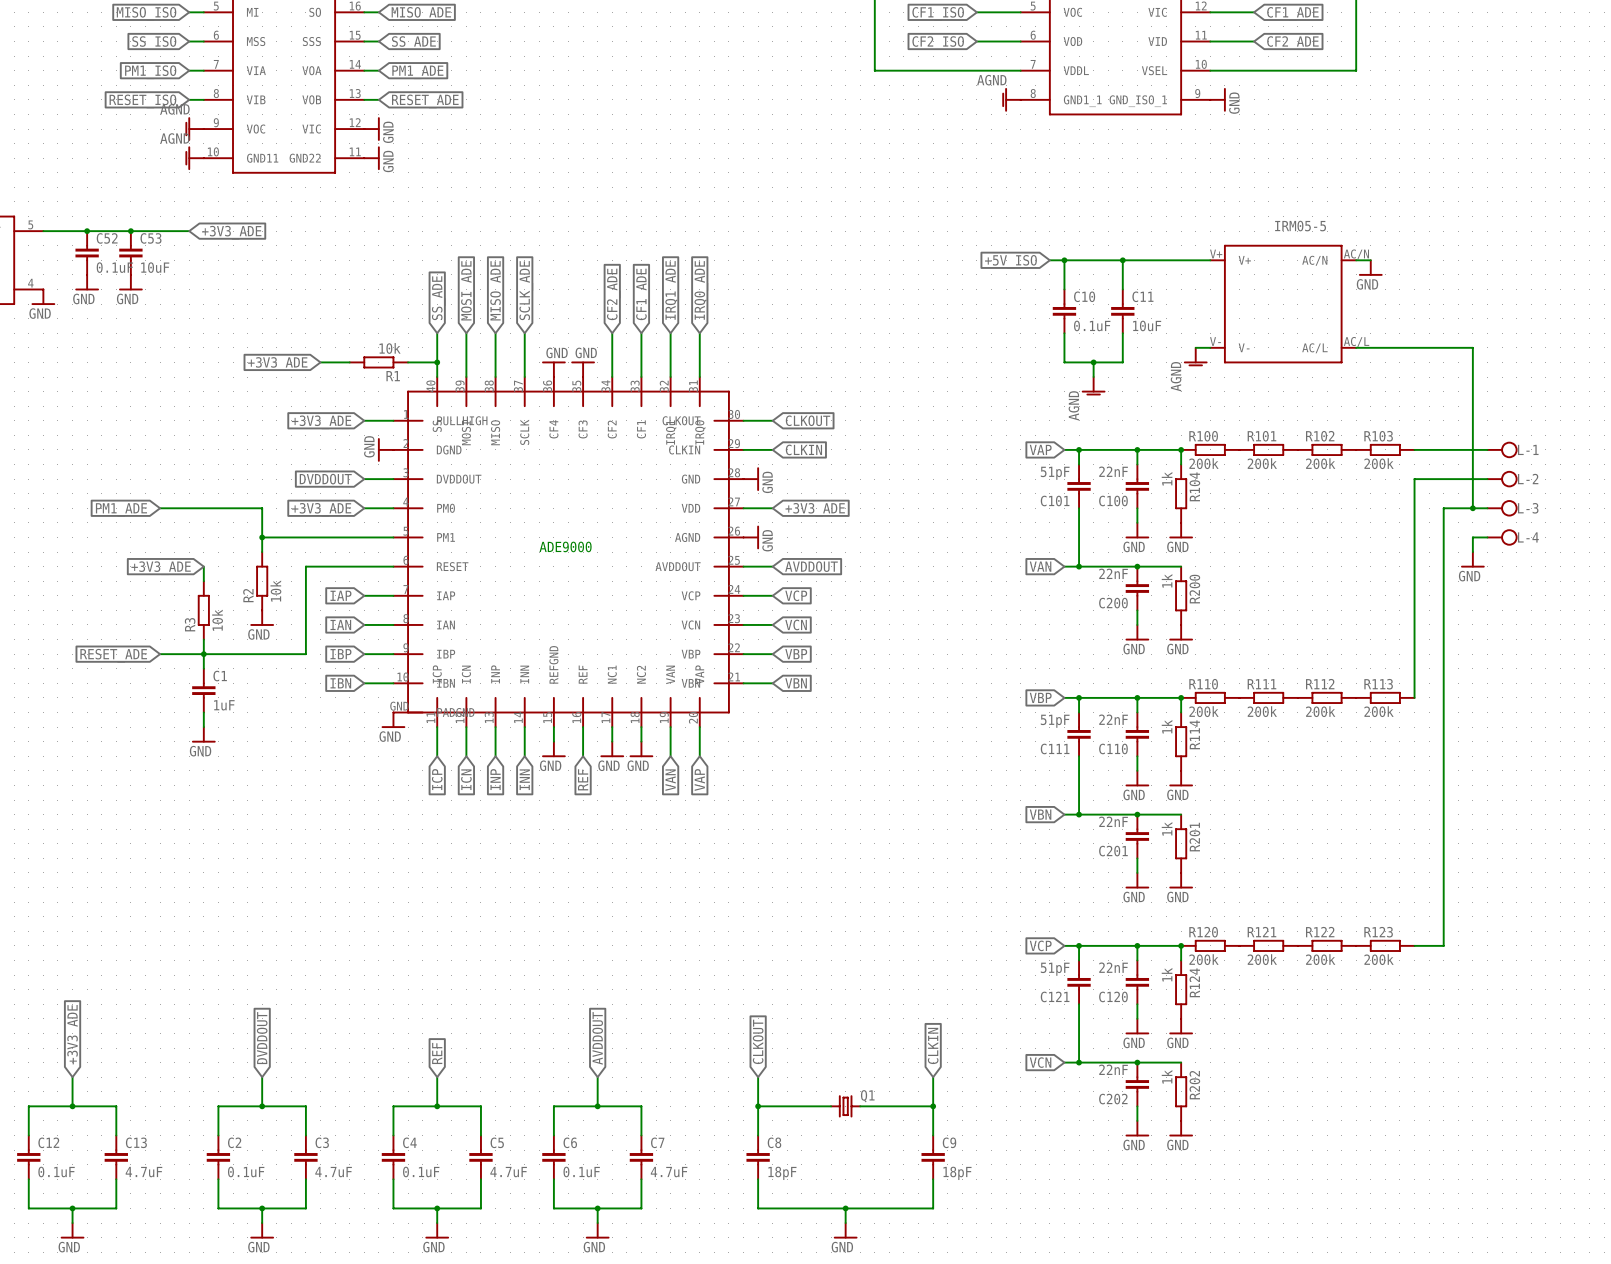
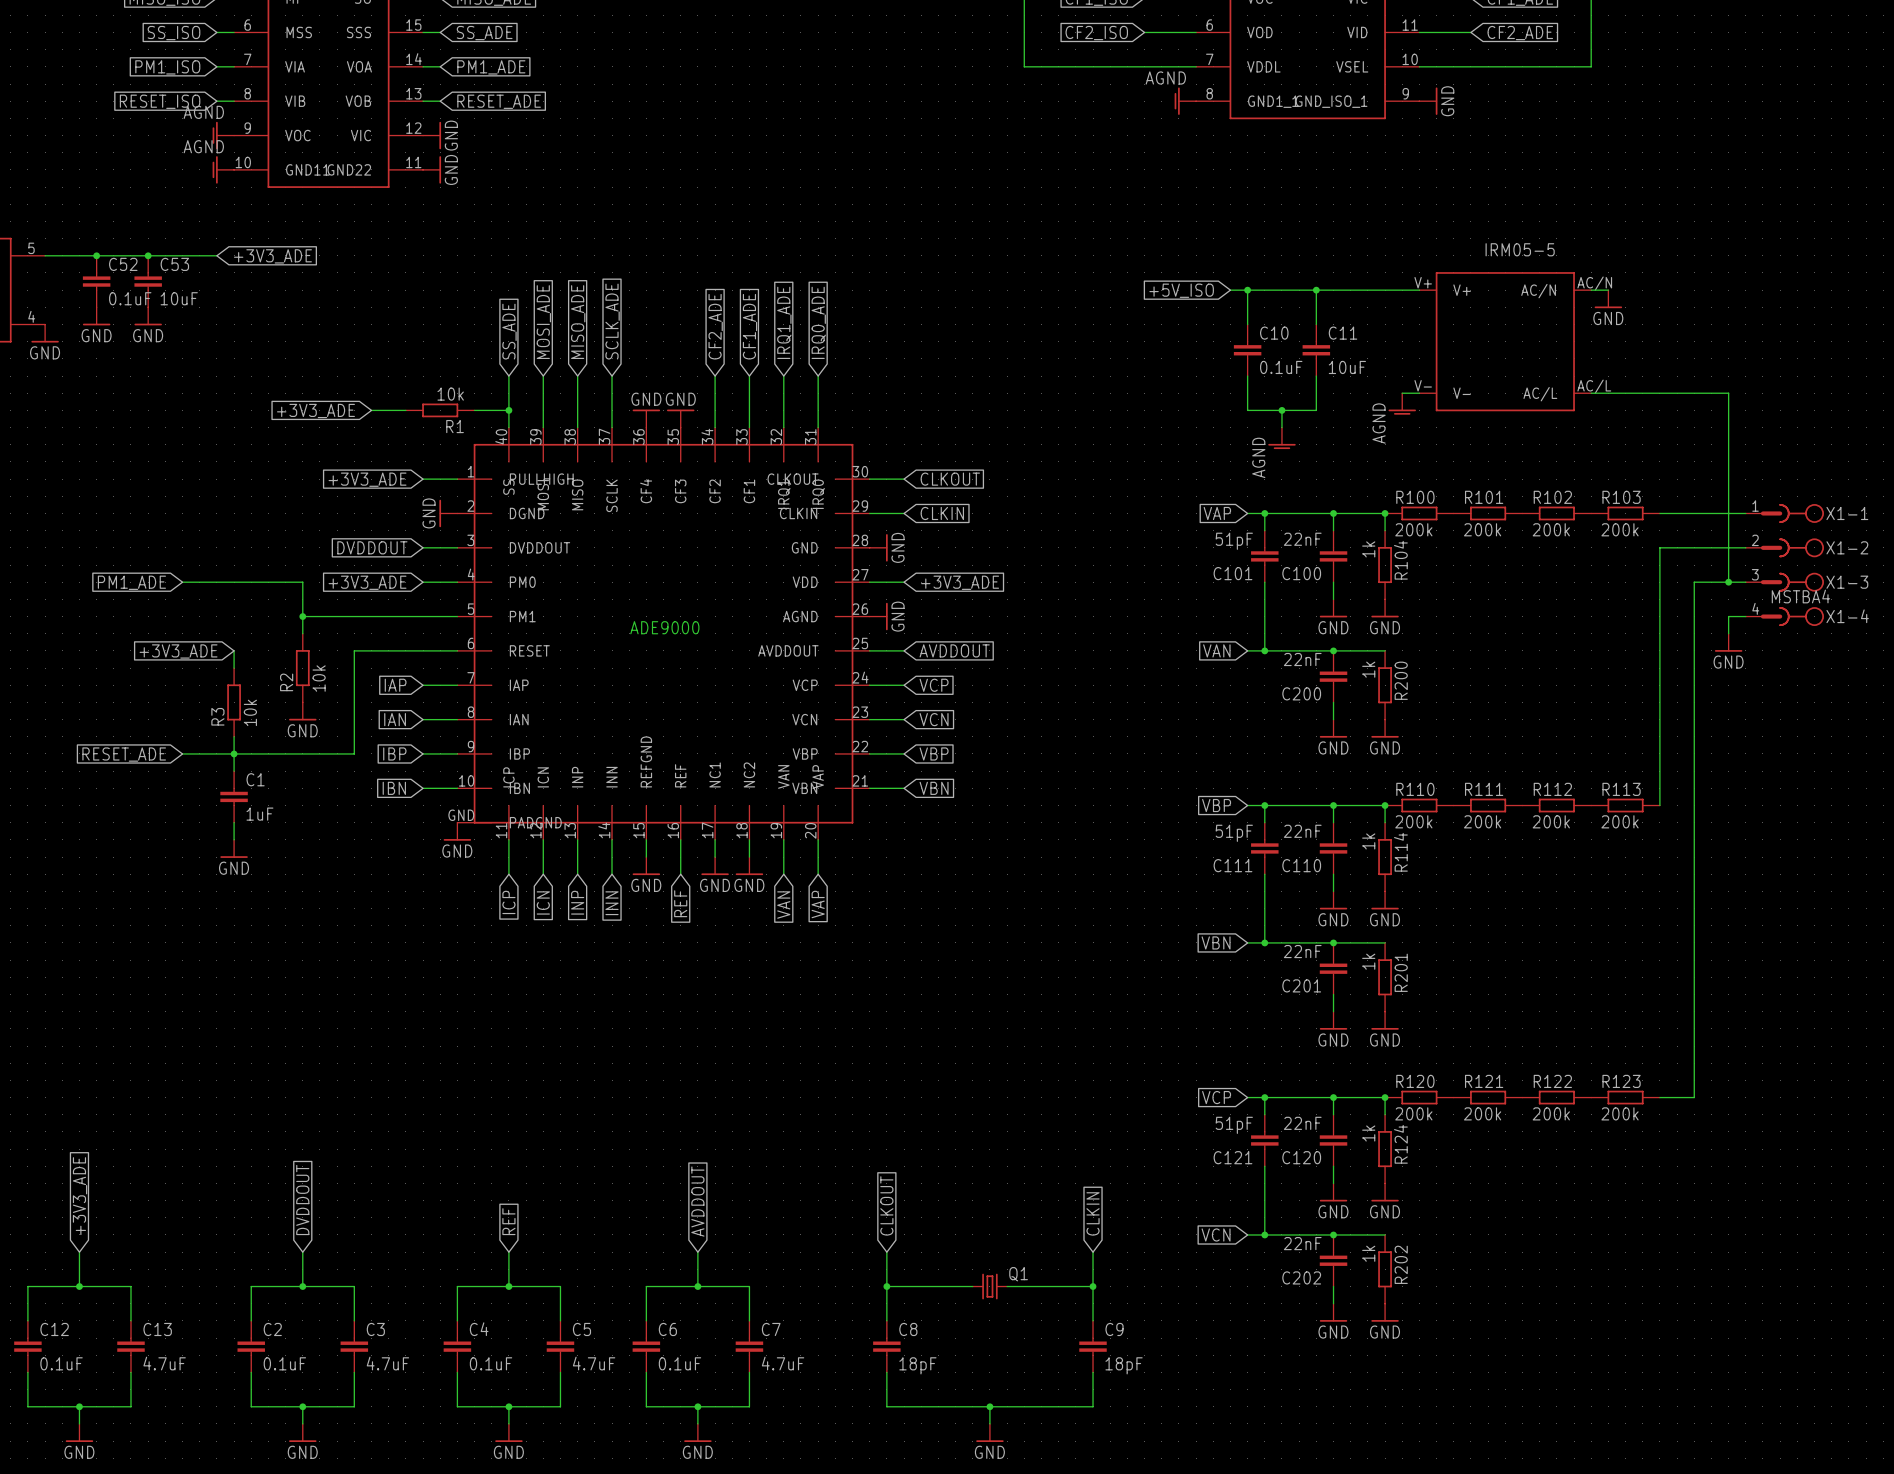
L-1: (1502, 449) -> none
X1-1: none -> (1784, 513)
L-2: (1502, 479) -> none
X1-2: none -> (1784, 547)
L-3: (1502, 508) -> none
X1-3: none -> (1784, 582)
L-4: (1502, 537) -> none
X1-4: none -> MSTBA4 (1784, 616)

